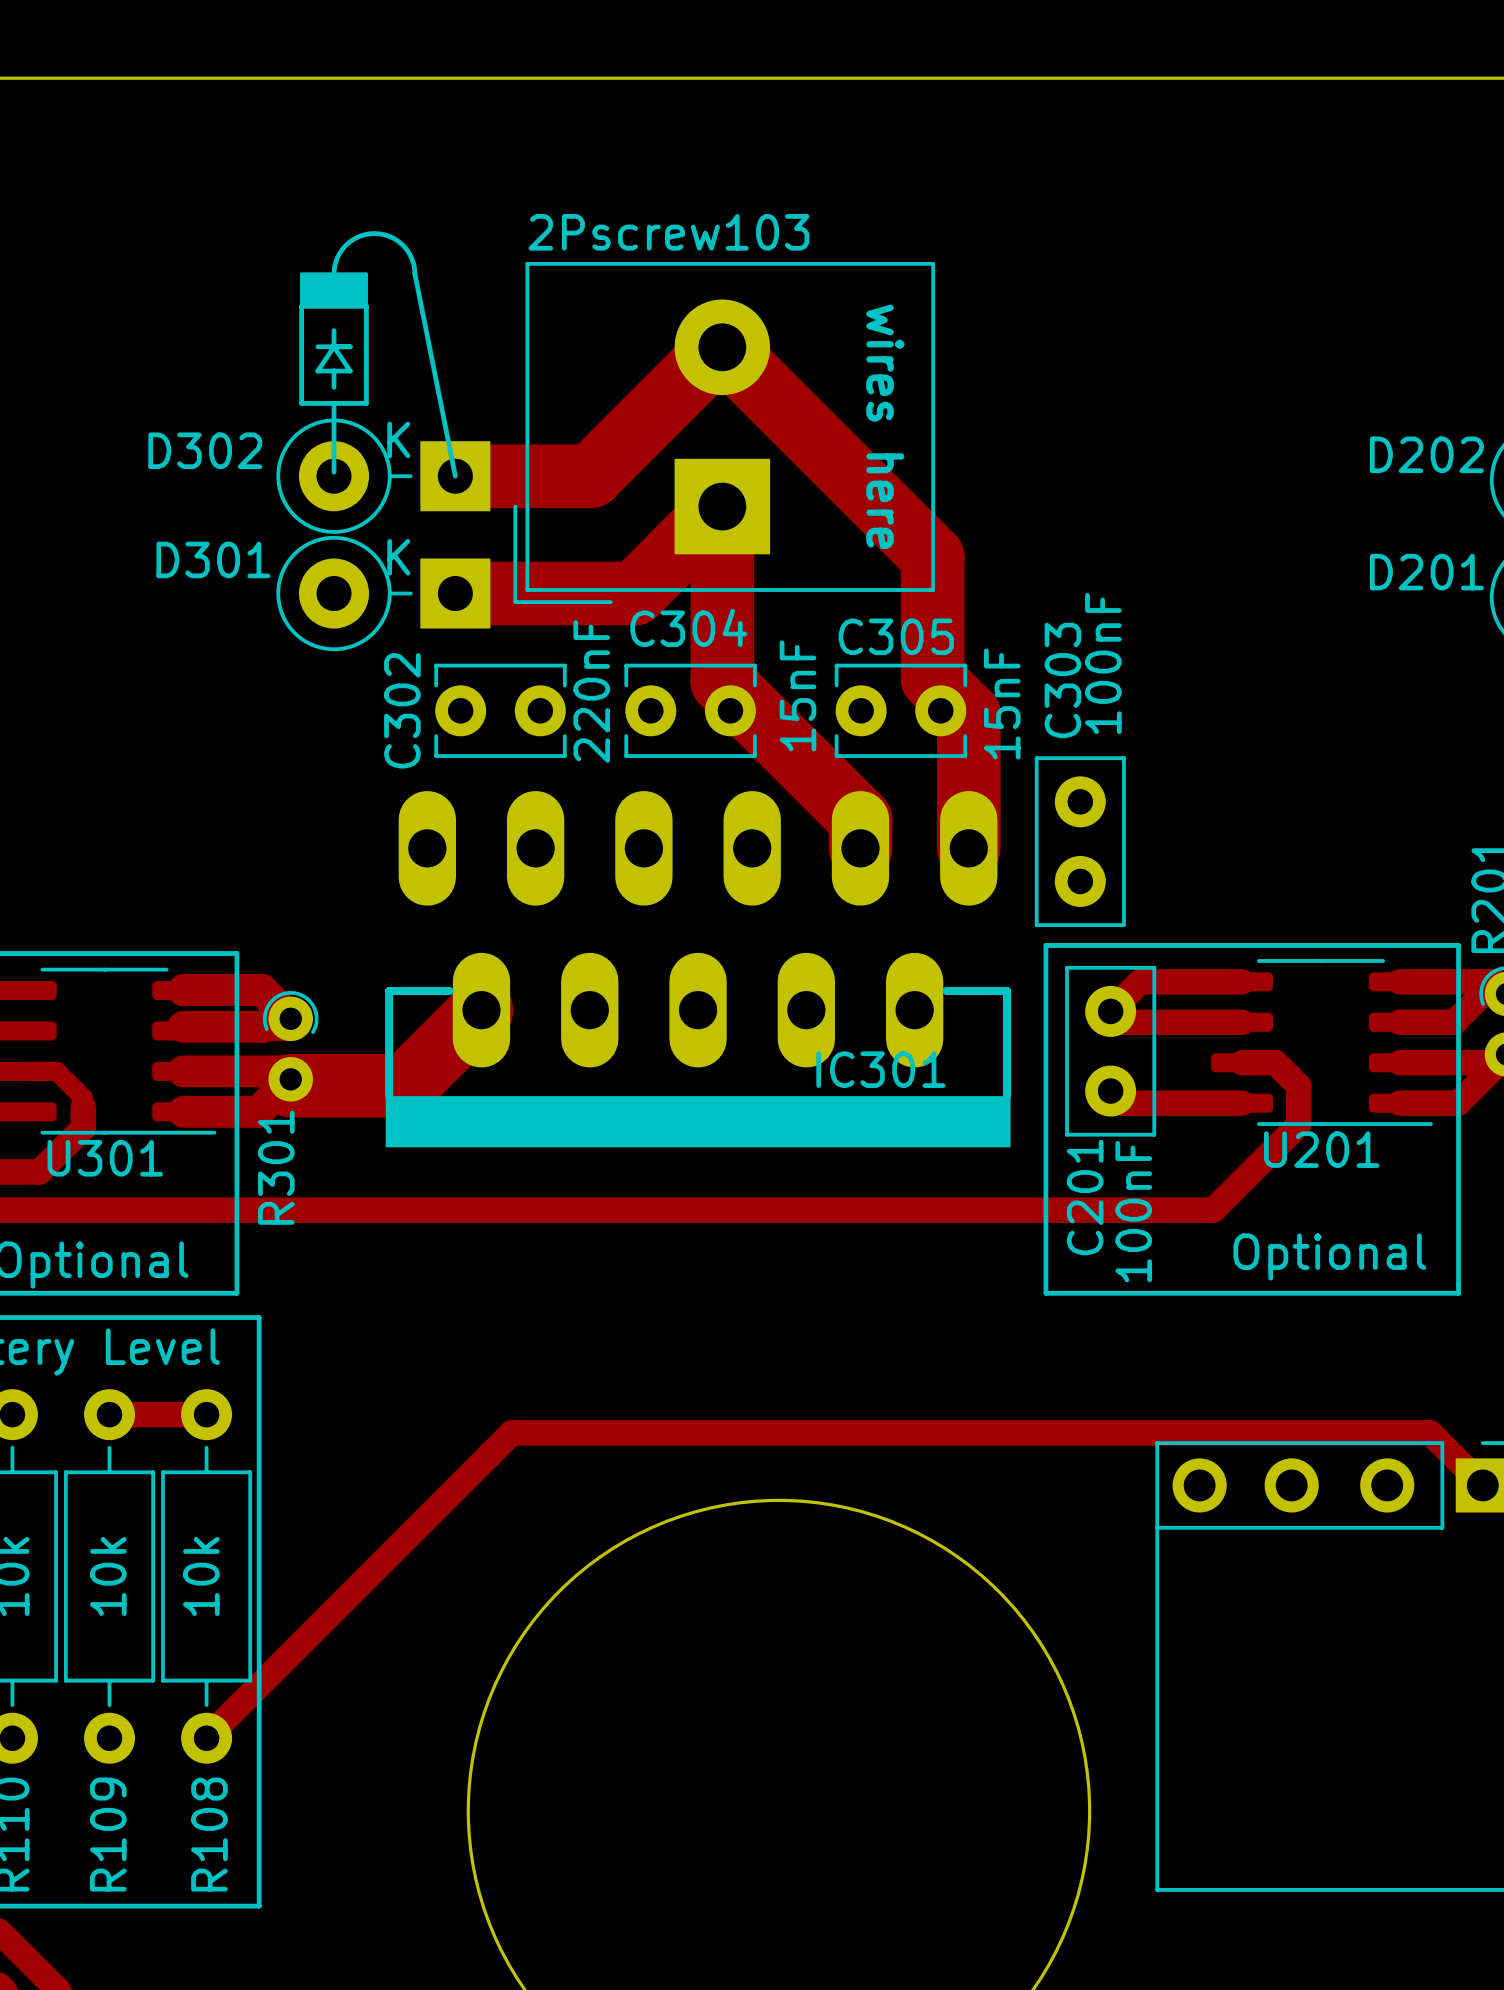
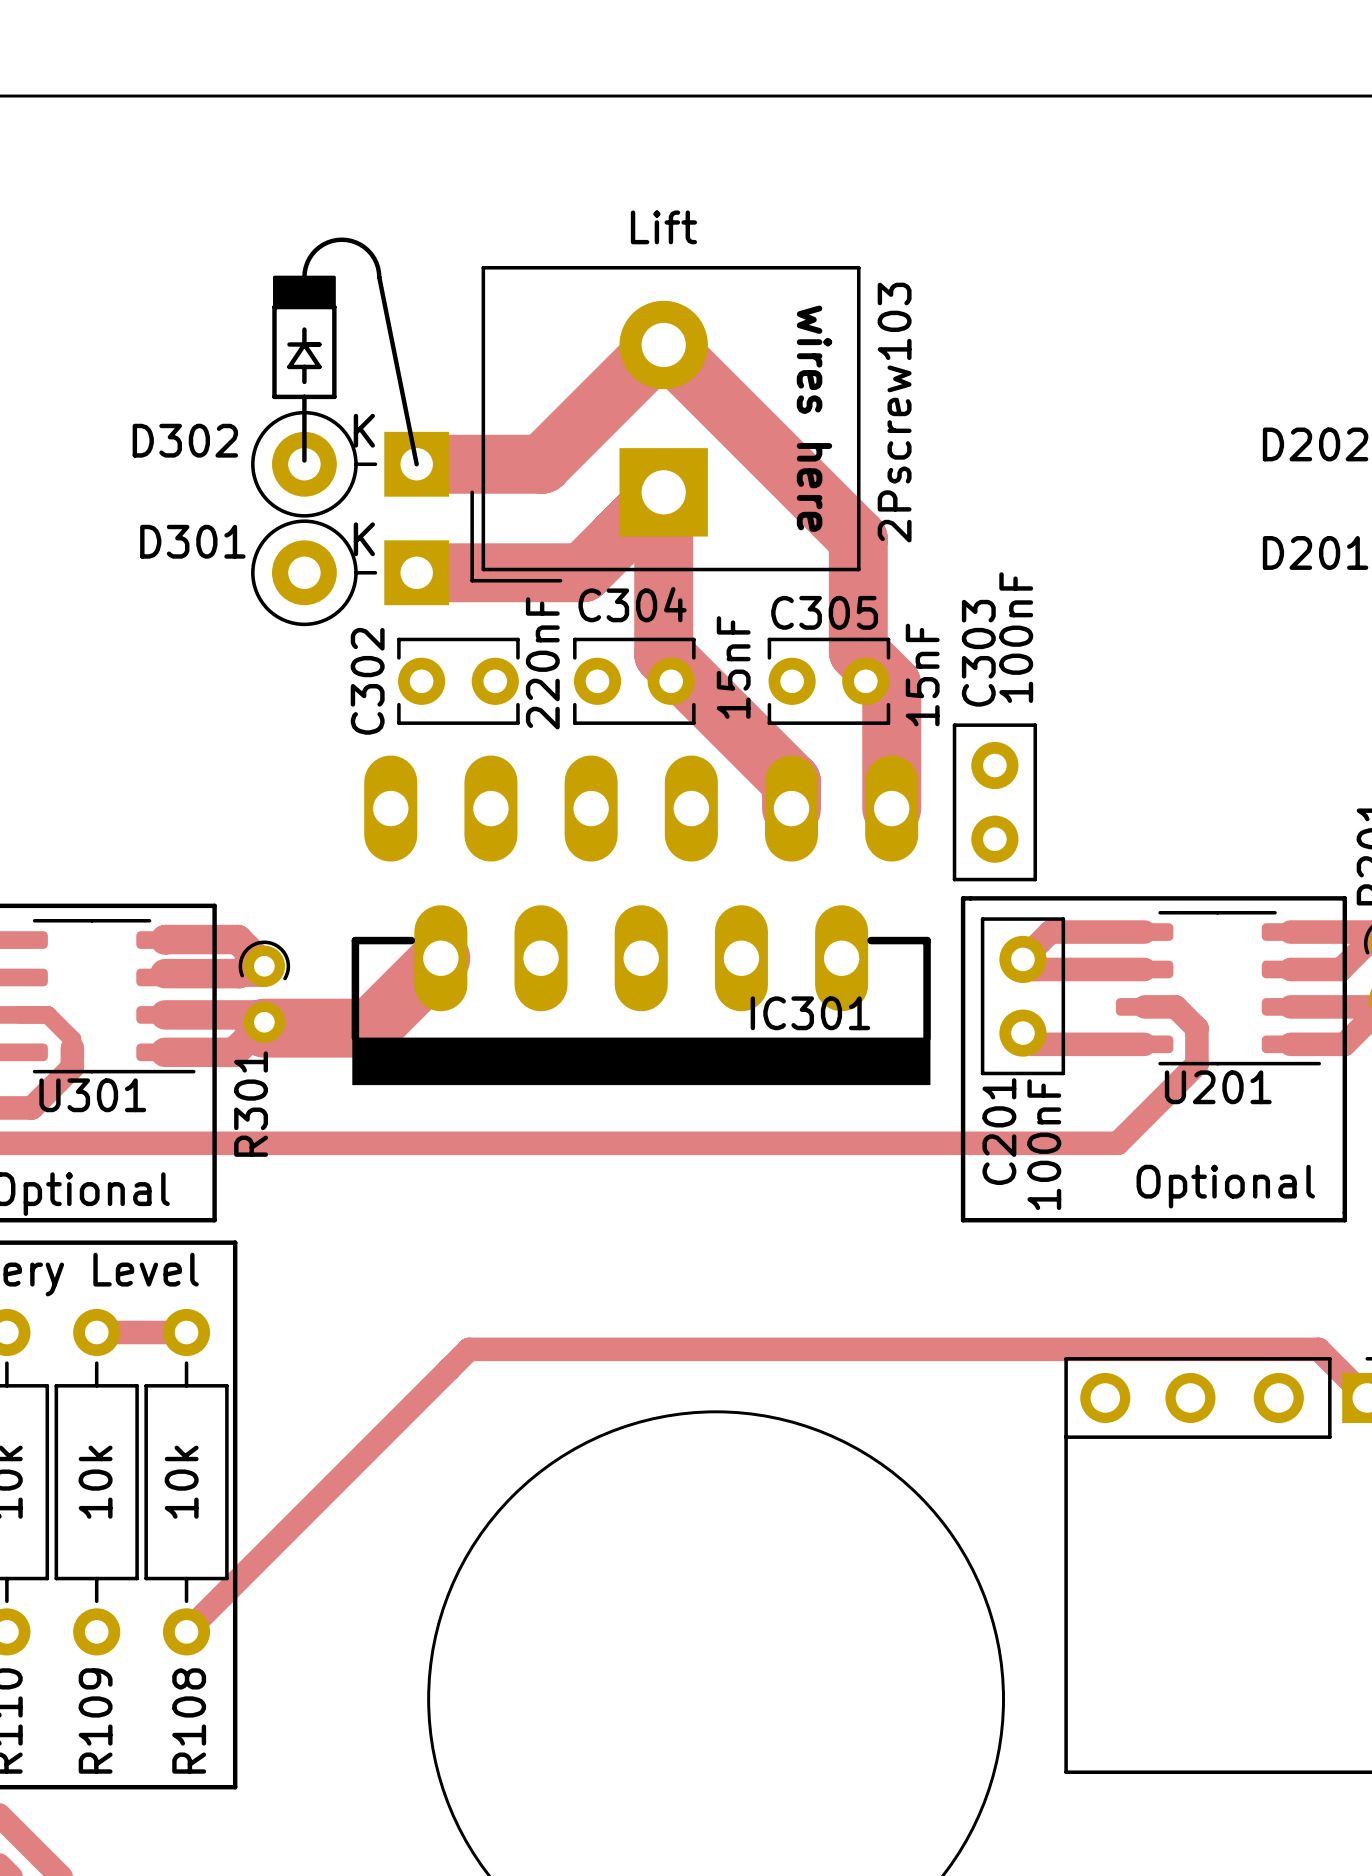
text: none -> Lift (663, 227)
2Pscrew103 name rotation: 0° (668, 232) -> 90° counterclockwise (894, 412)
2Pscrew103 name position: 2Pscrew103 (668, 232) -> 2Pscrew103 (894, 412)

